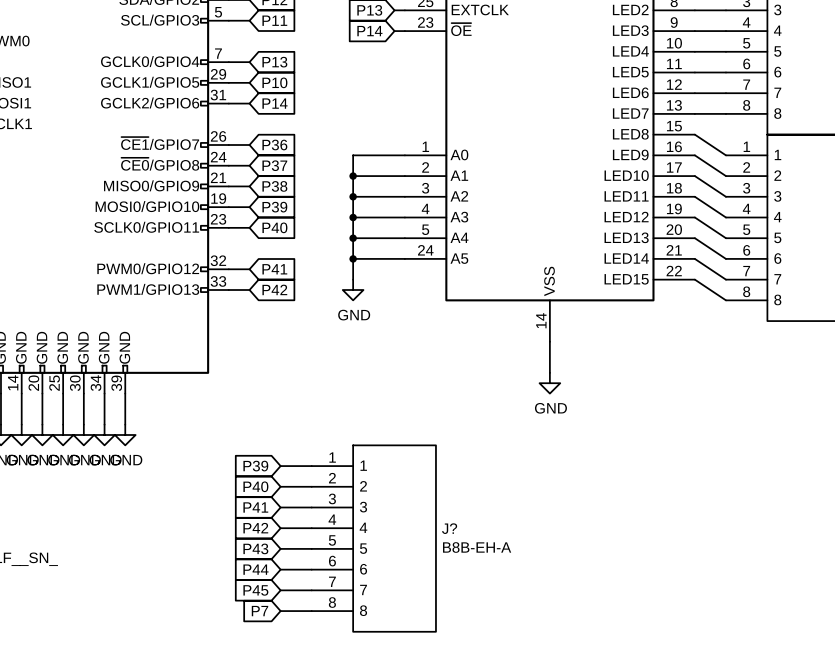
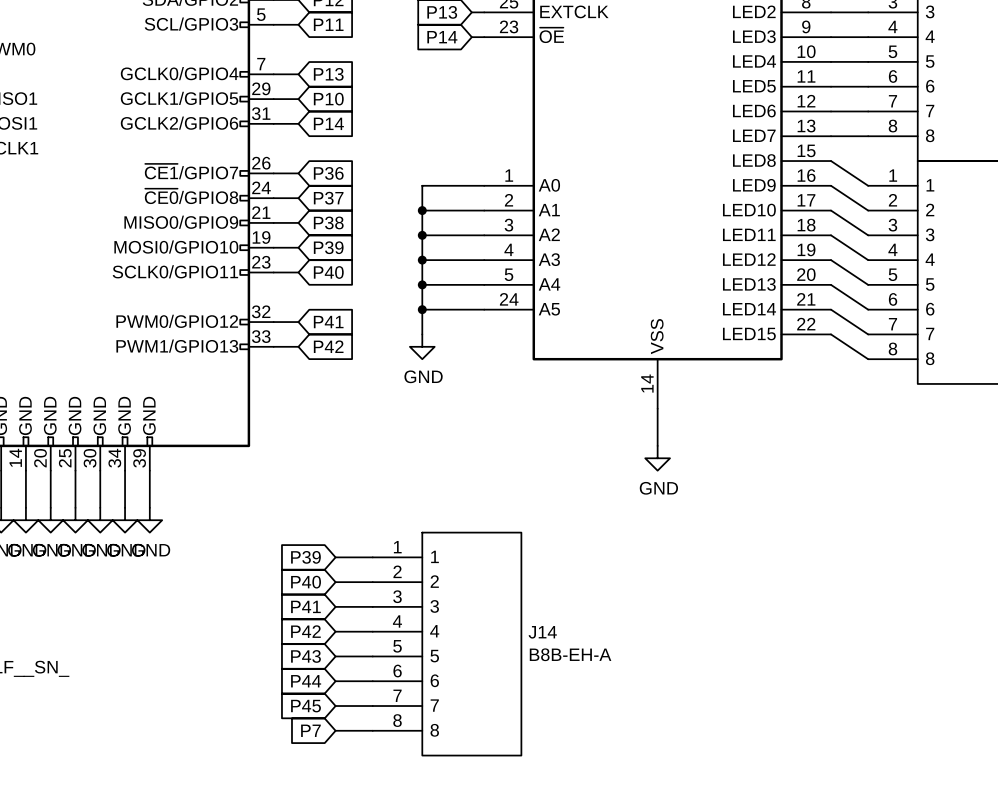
J? name: J? (449, 528) -> J14 (542, 632)

